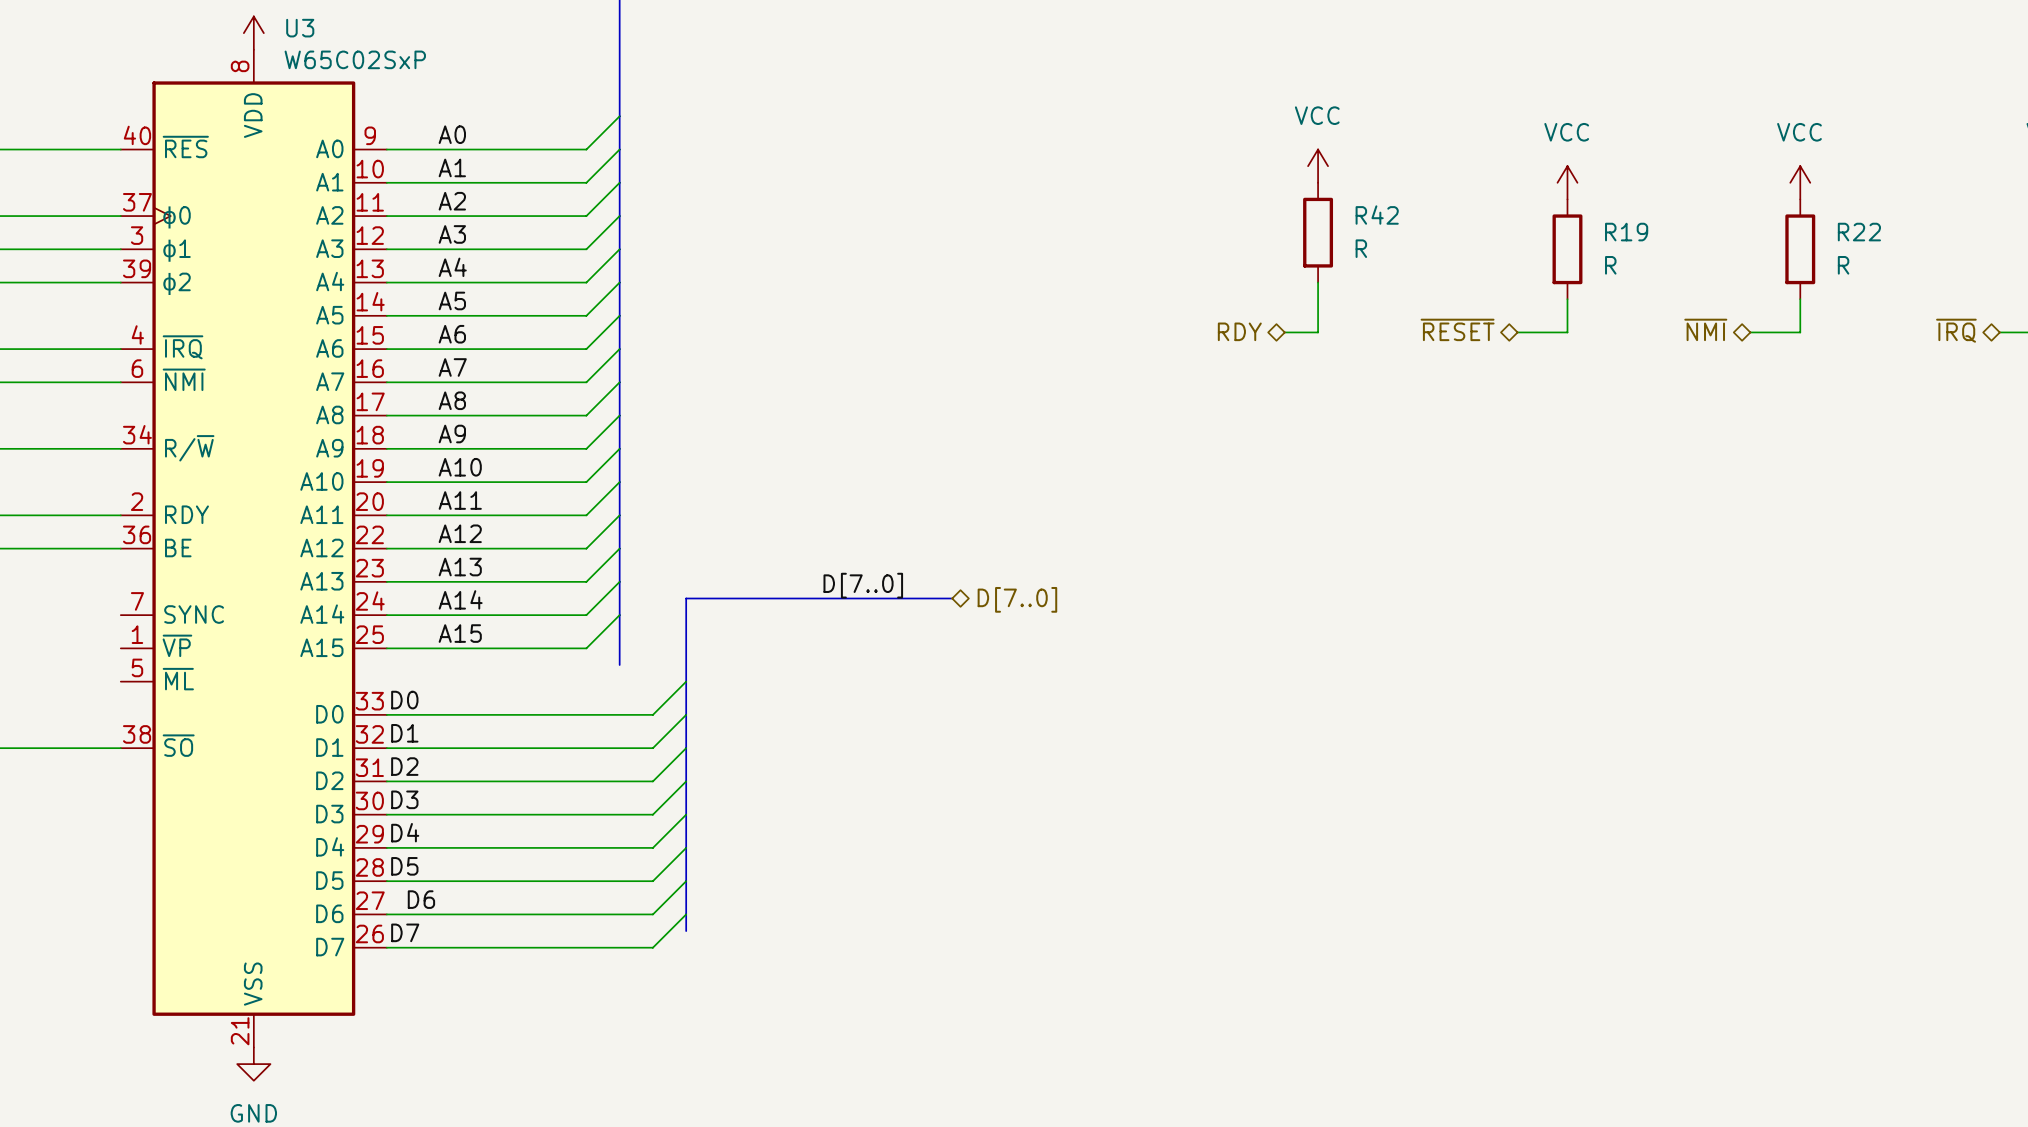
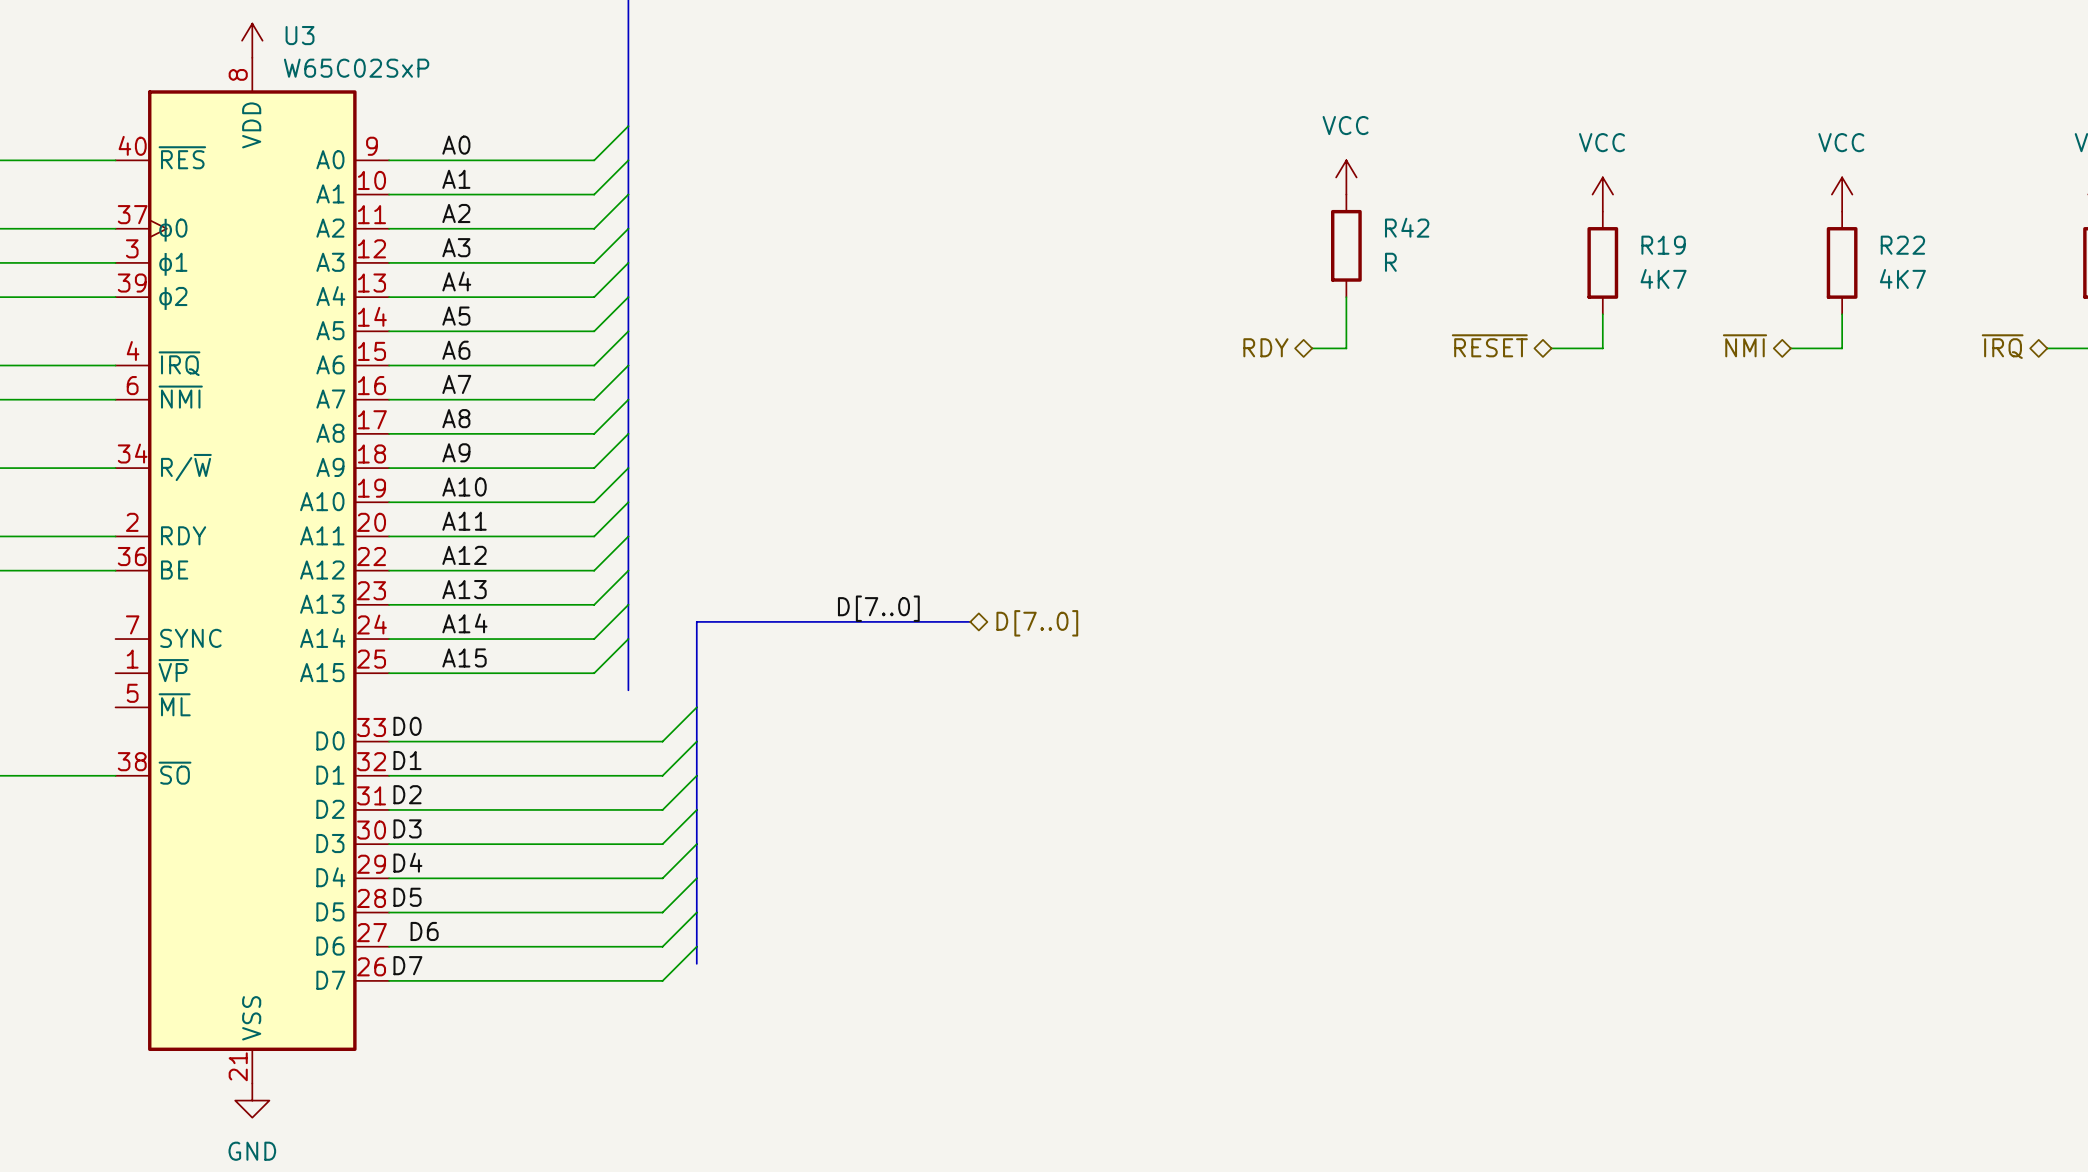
R19 value: R (1610, 265) -> 4K7 (1663, 278)
R22 value: R (1843, 265) -> 4K7 (1902, 278)

